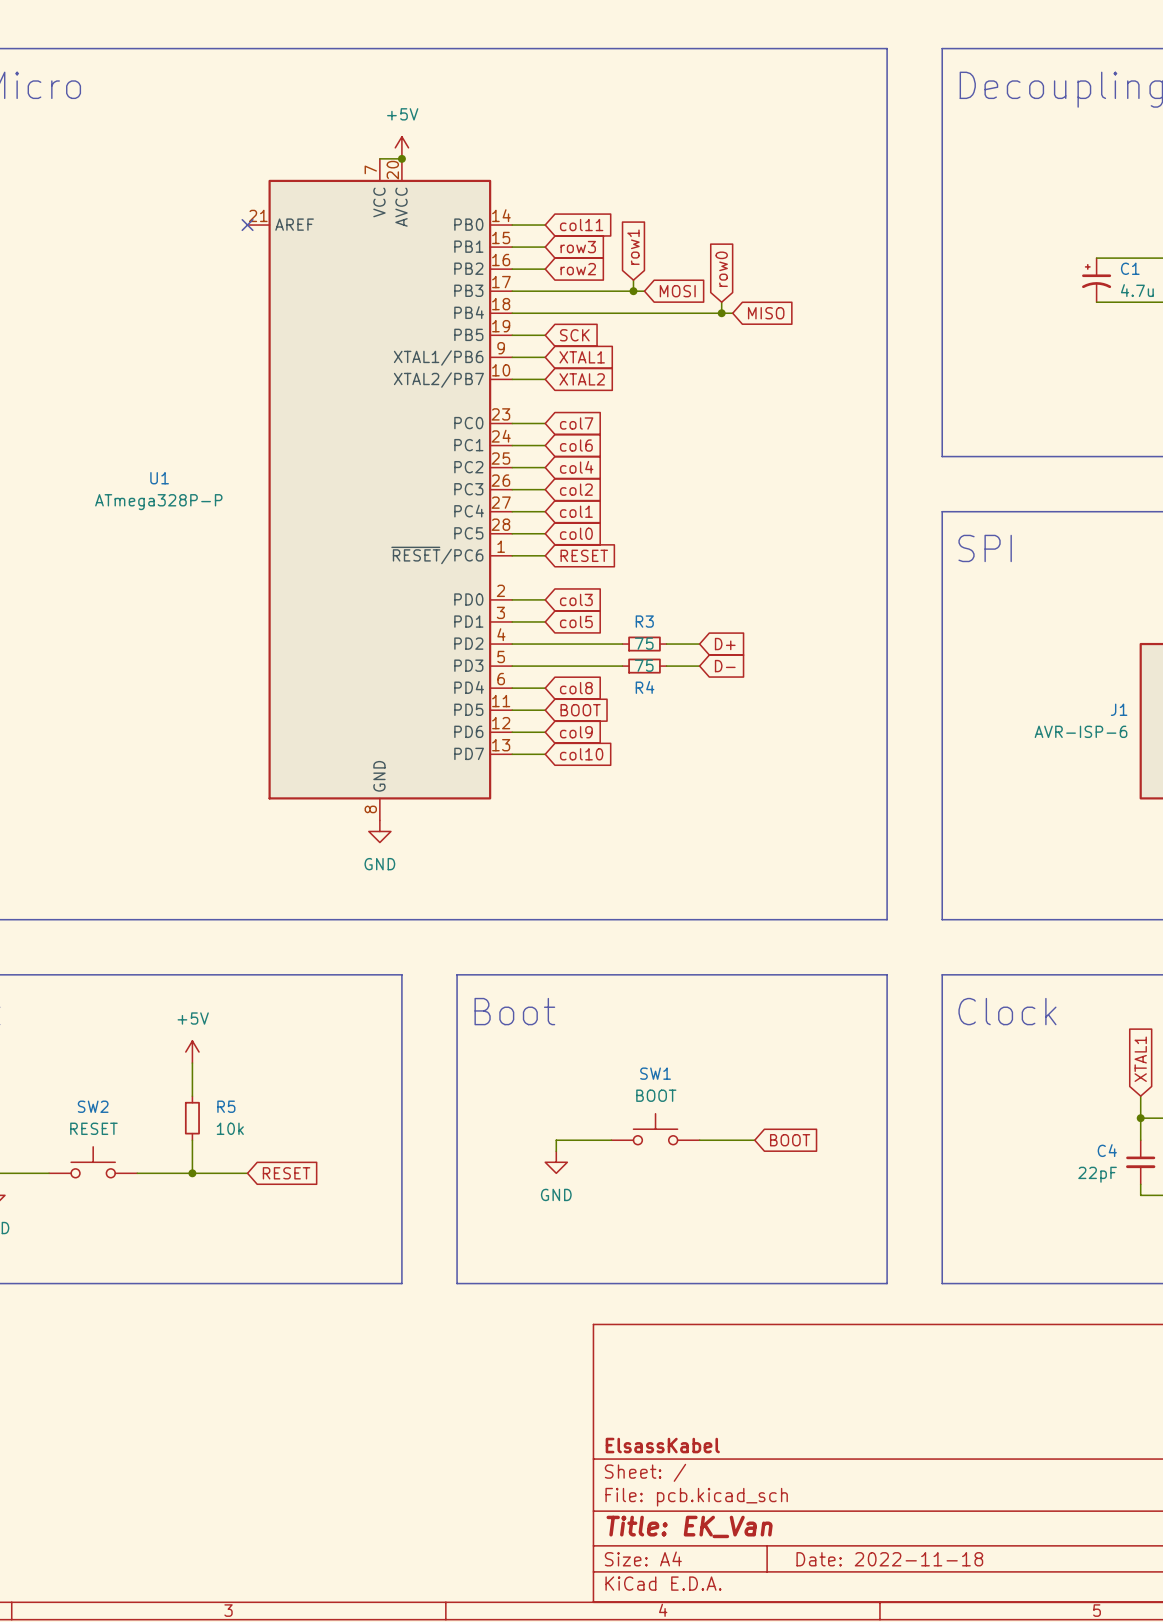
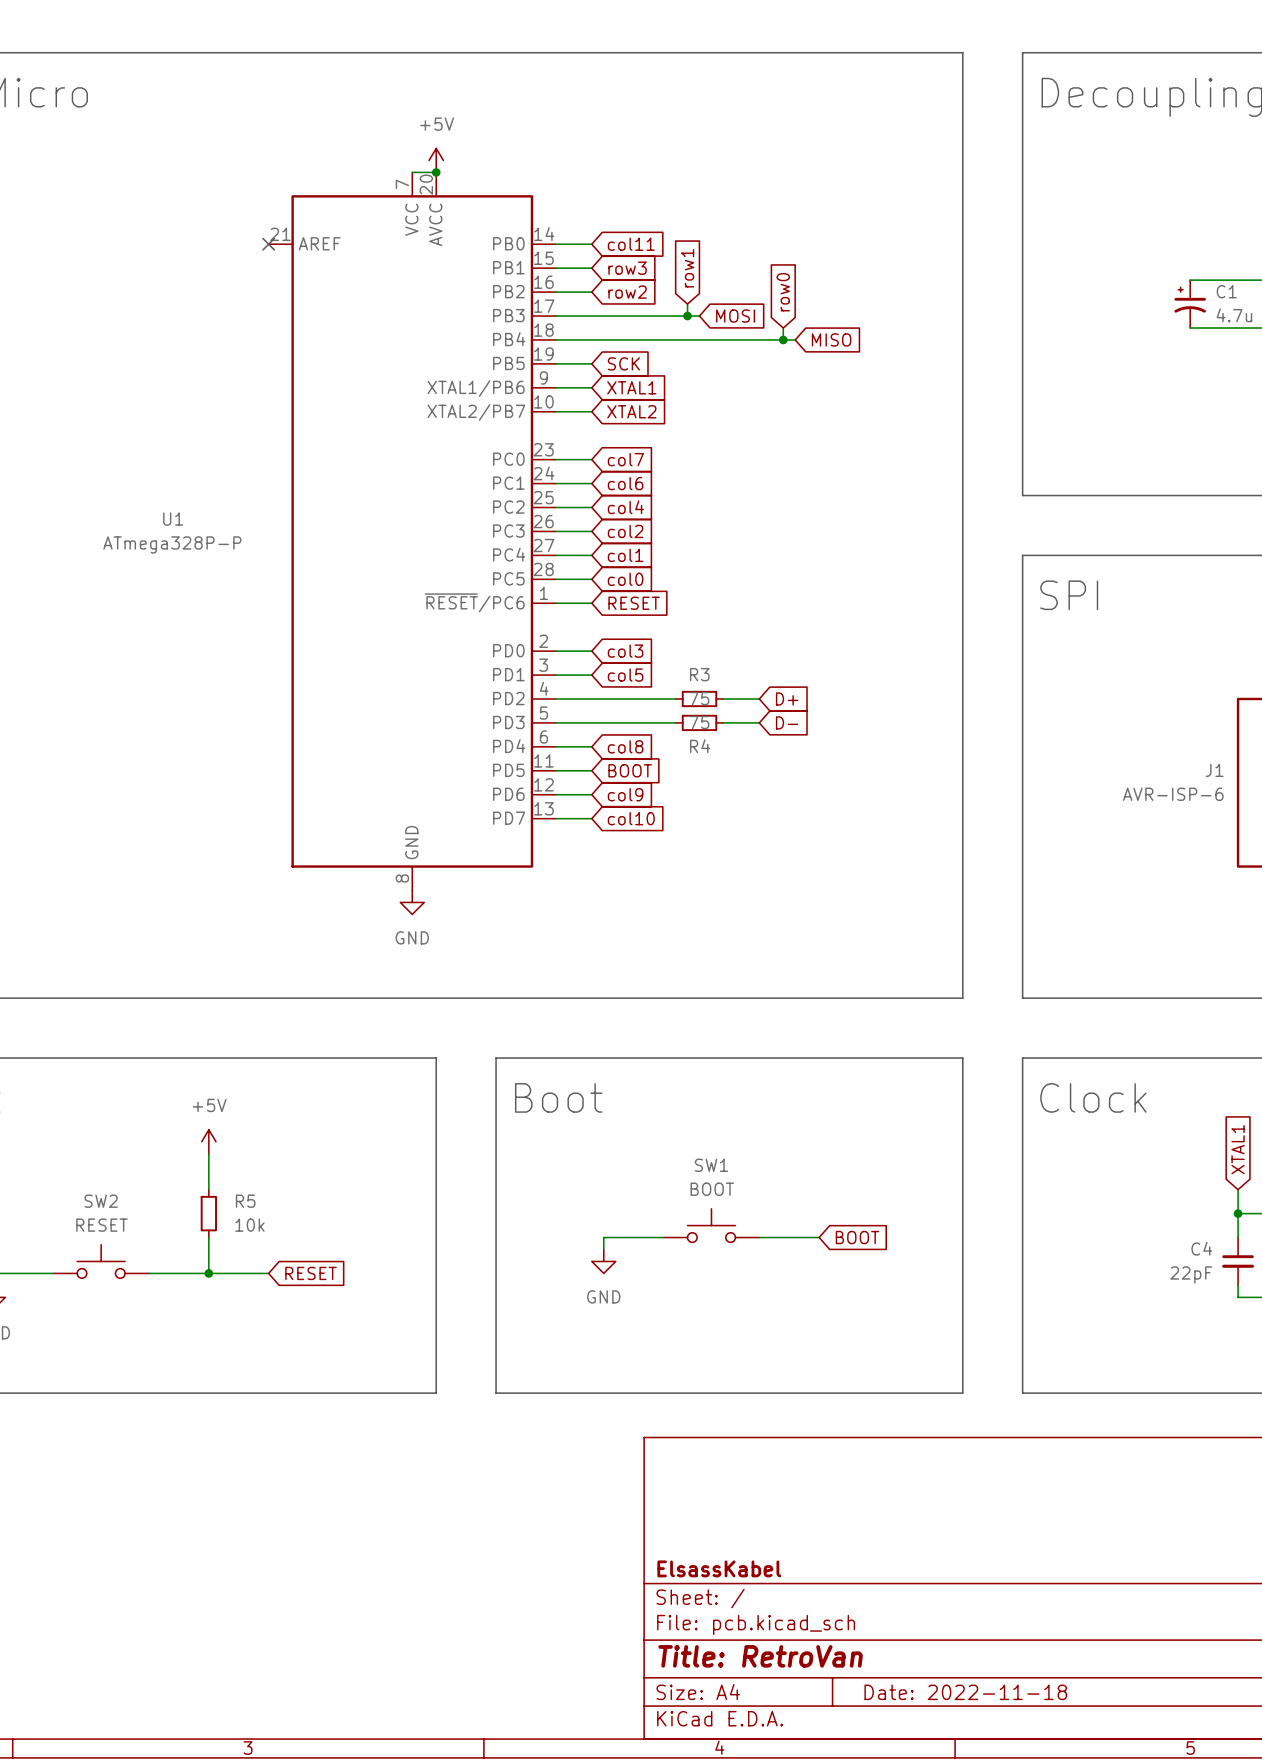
title block: Title: EK_Van (689, 1526) -> Title: RetroVan (760, 1656)

